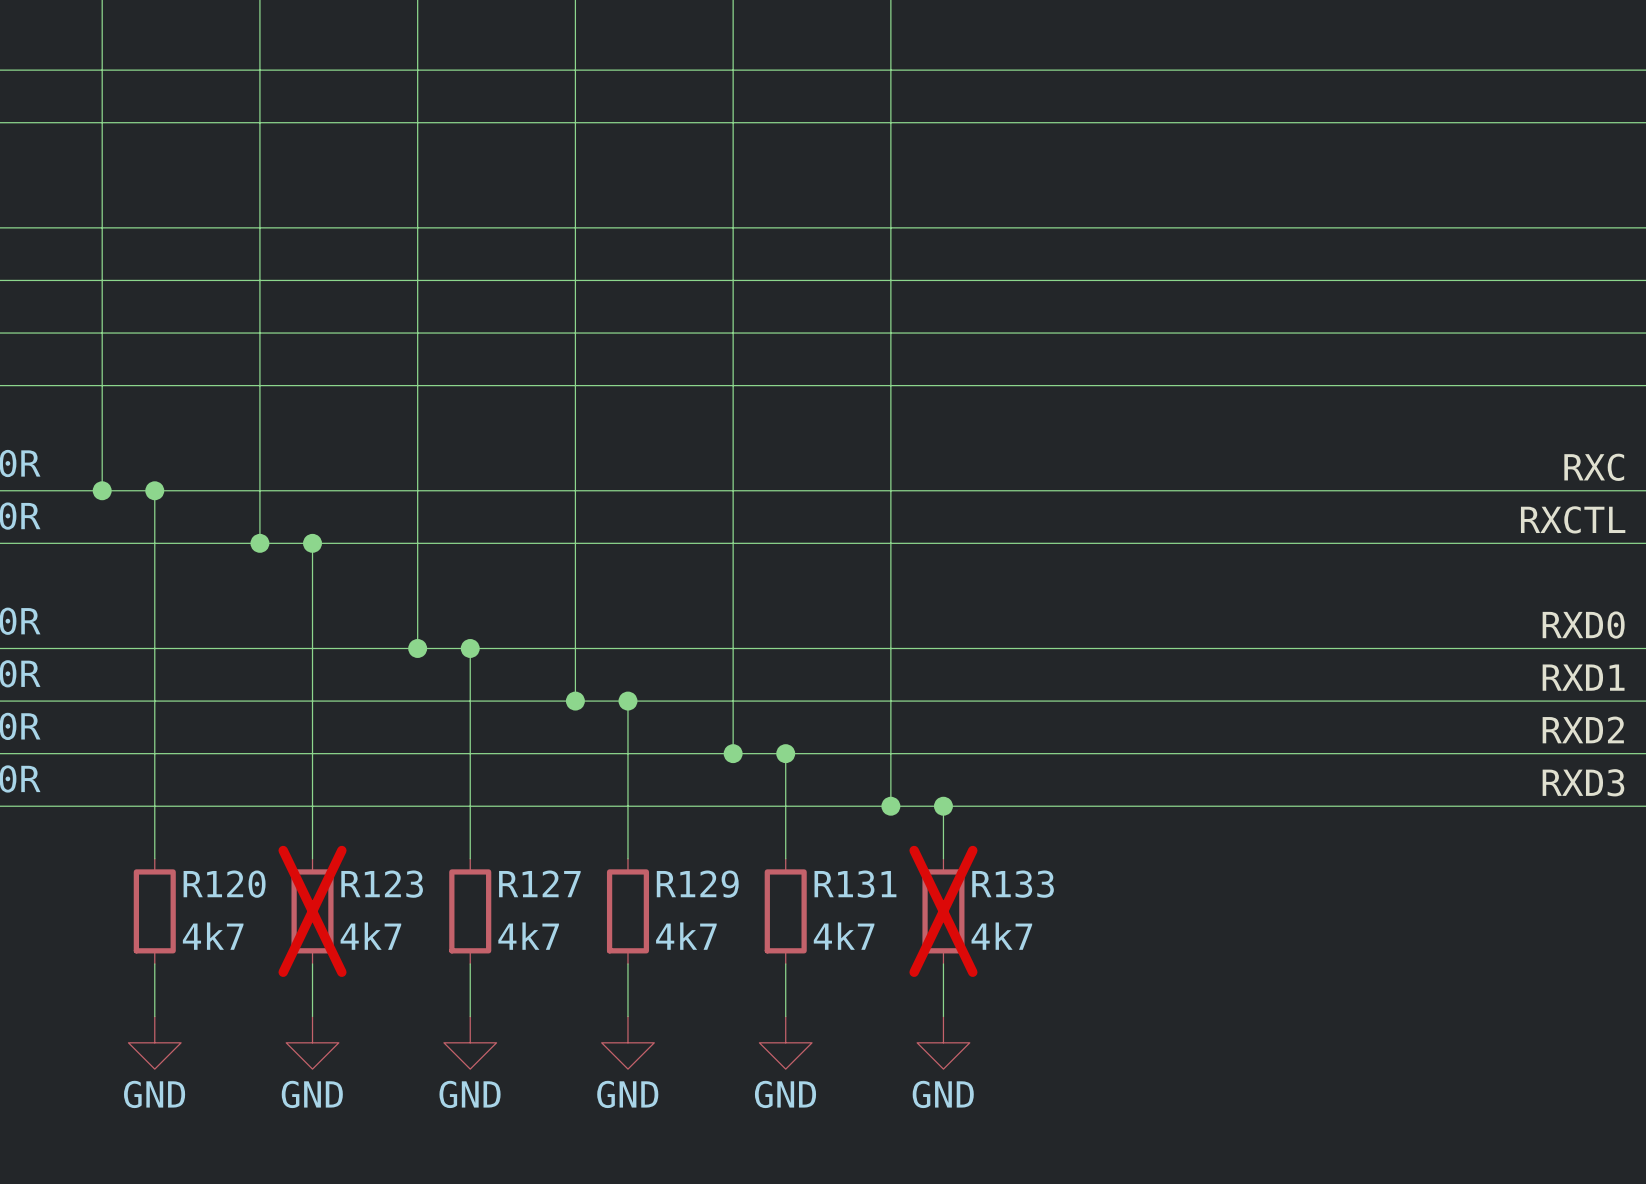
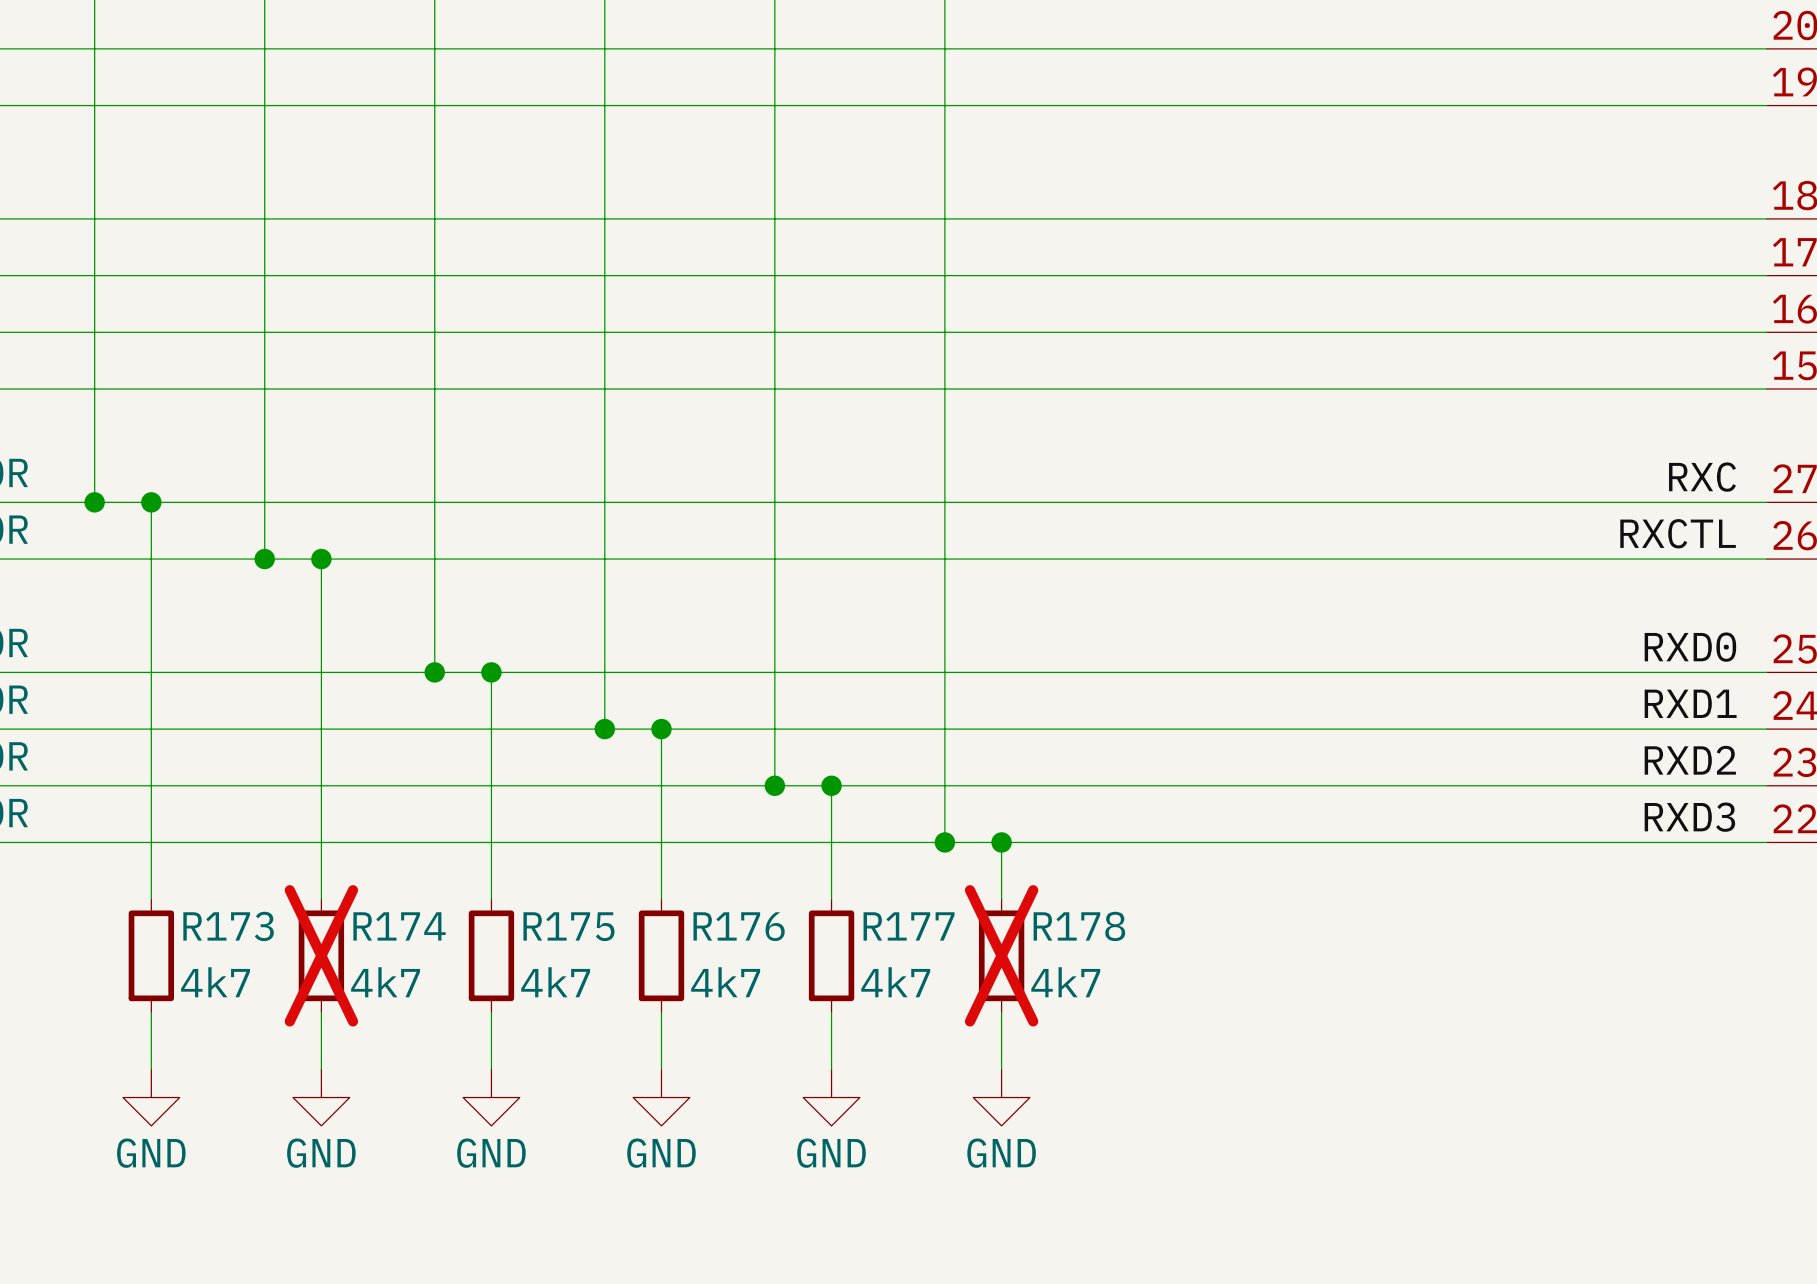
R127 name: R127 (539, 883) -> R175 (568, 926)
R120 name: R120 (224, 884) -> R173 (228, 926)
R123 name: R123 (382, 884) -> R174 (399, 926)
R129 name: R129 (697, 884) -> R176 (739, 926)
R131 name: R131 (855, 884) -> R177 (909, 926)
R133 name: R133 (1013, 884) -> R178 (1079, 926)

